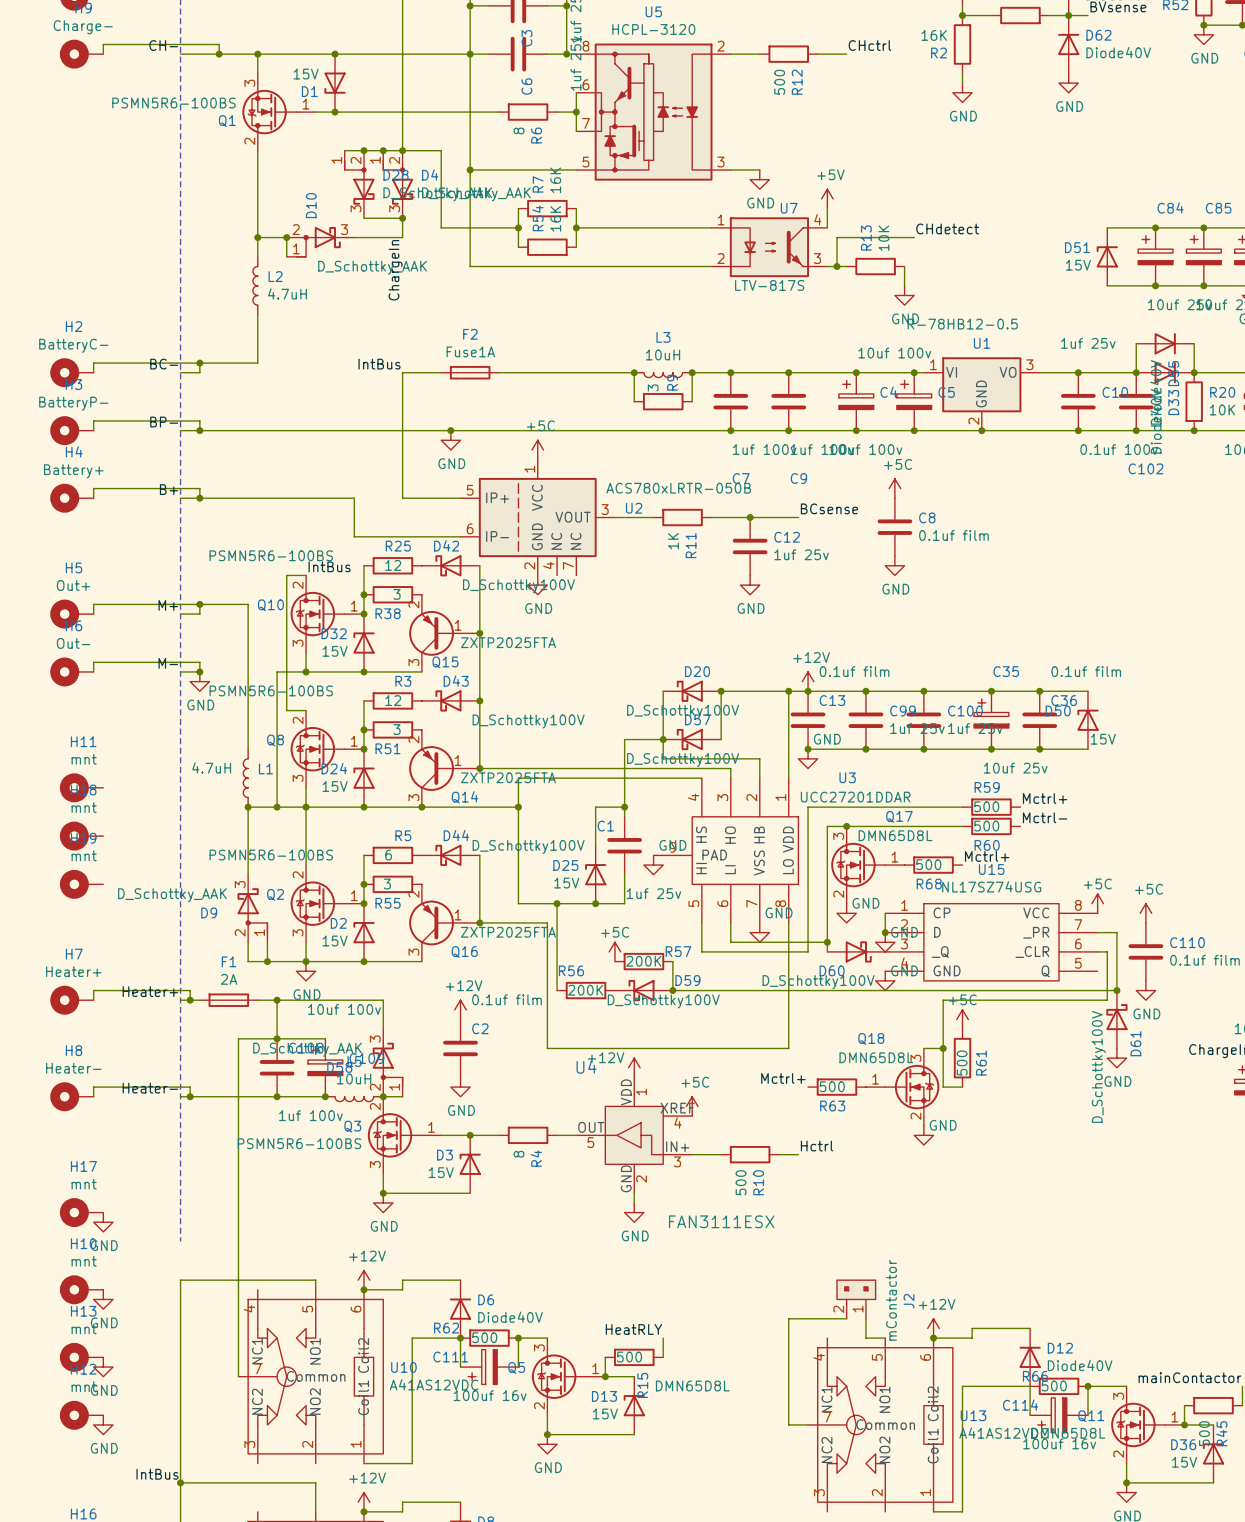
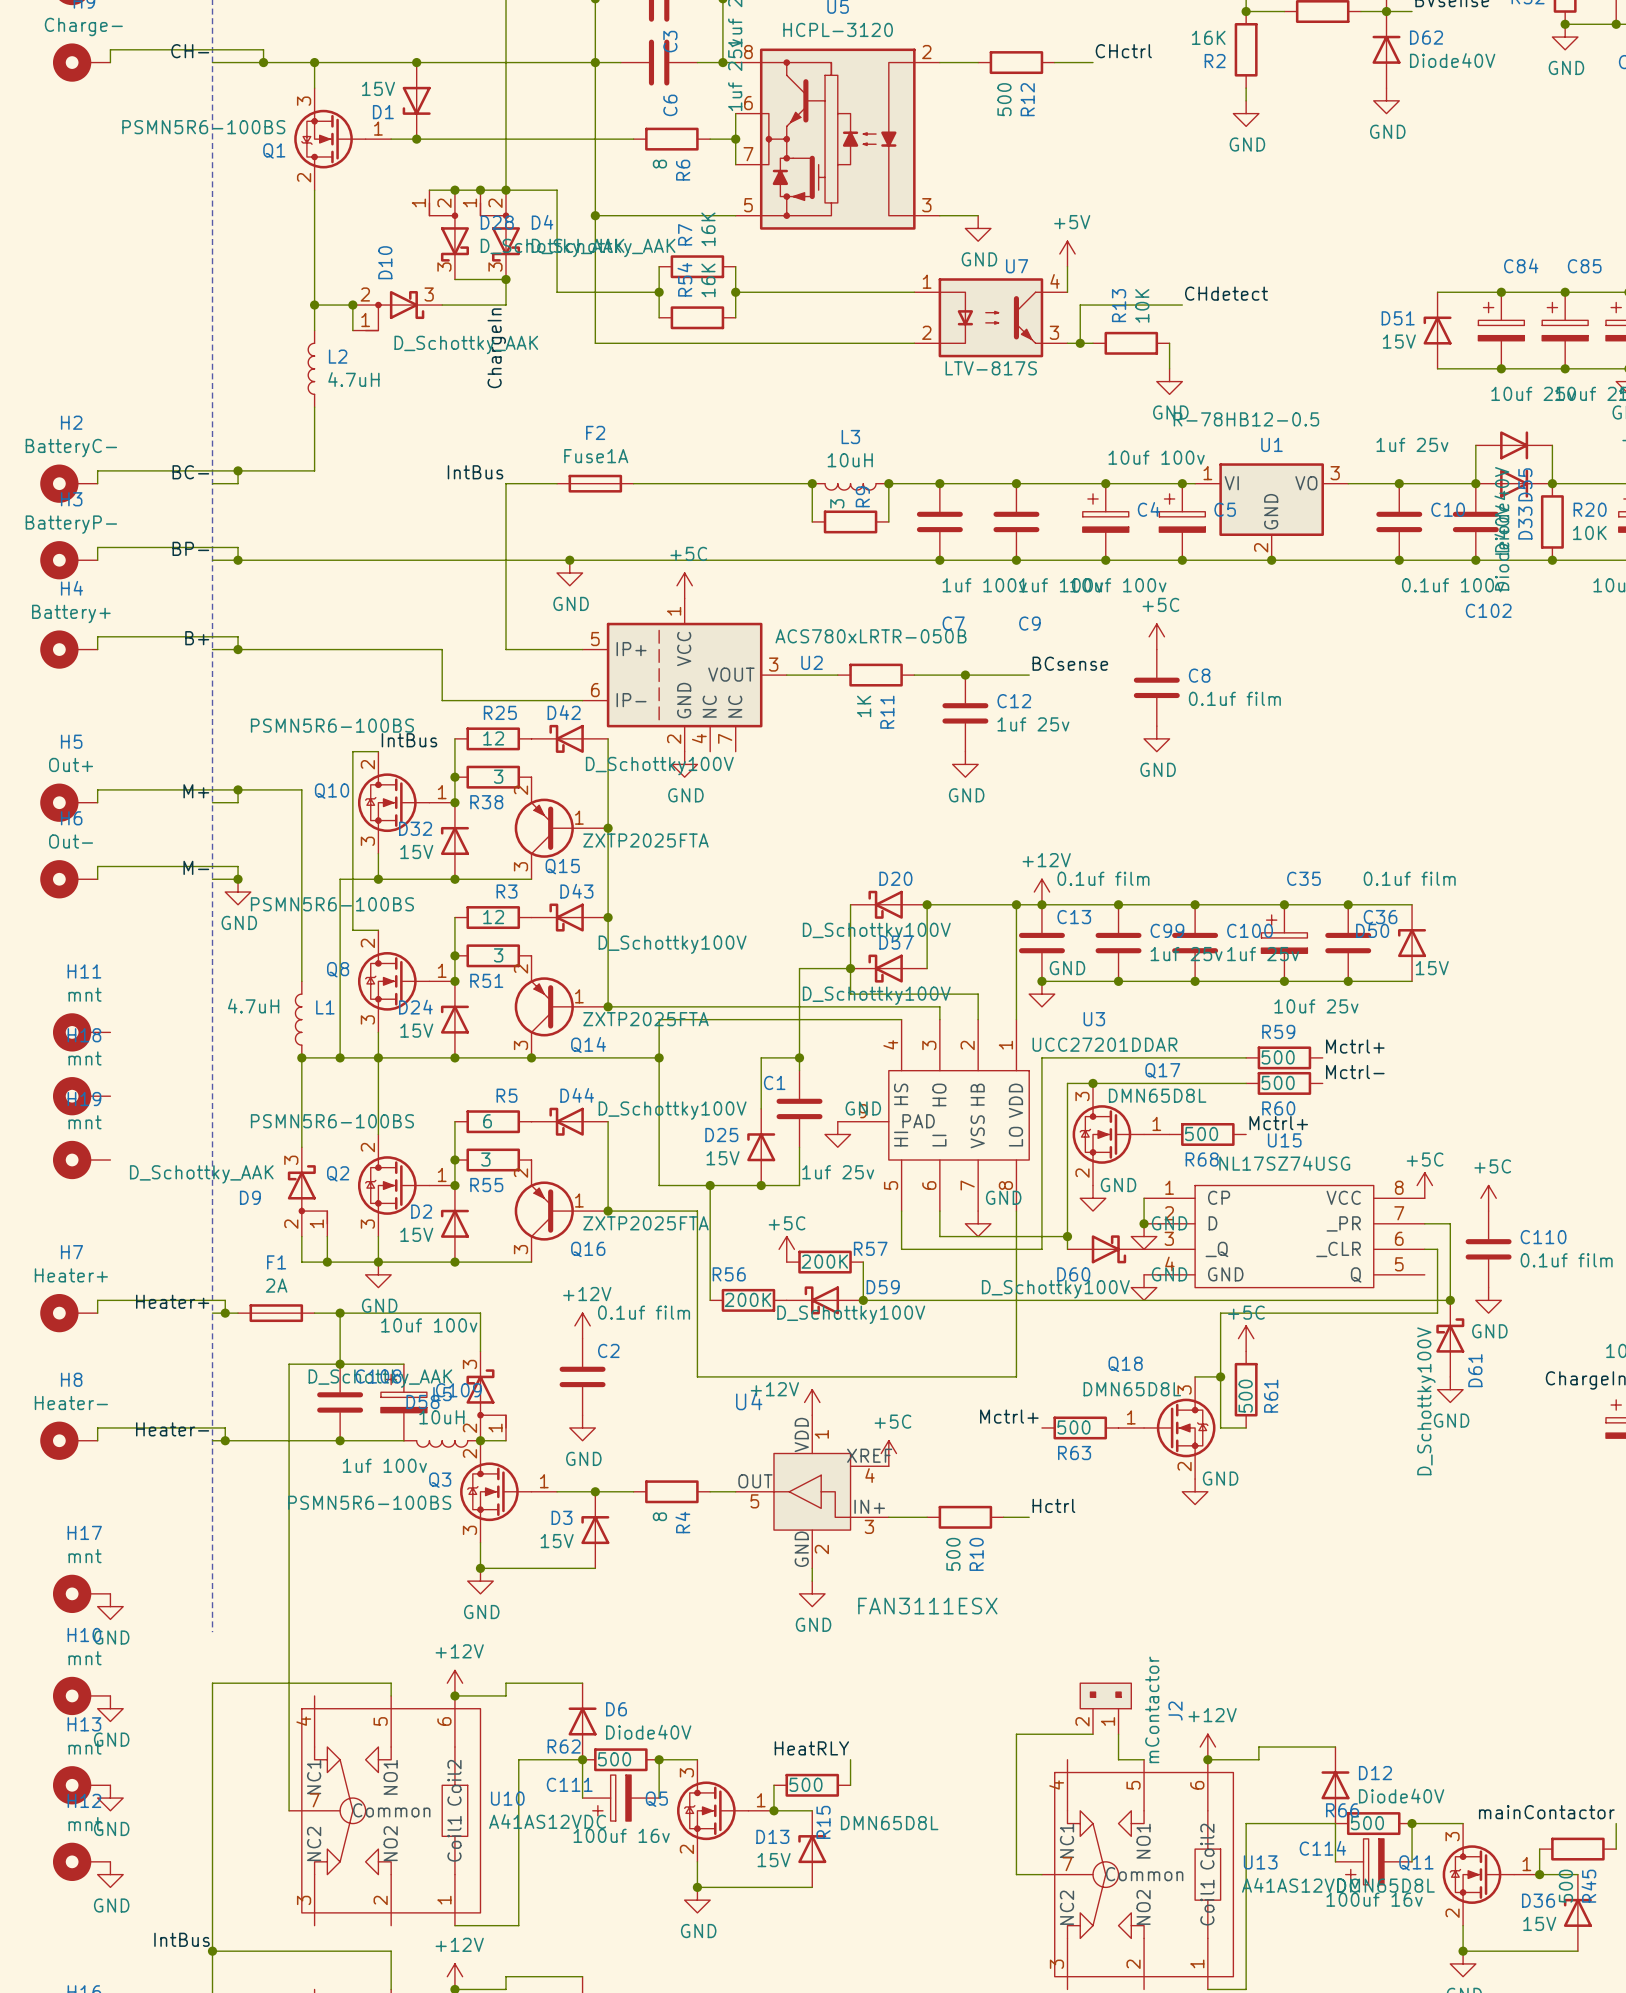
junction: (325, 1096) -> none

